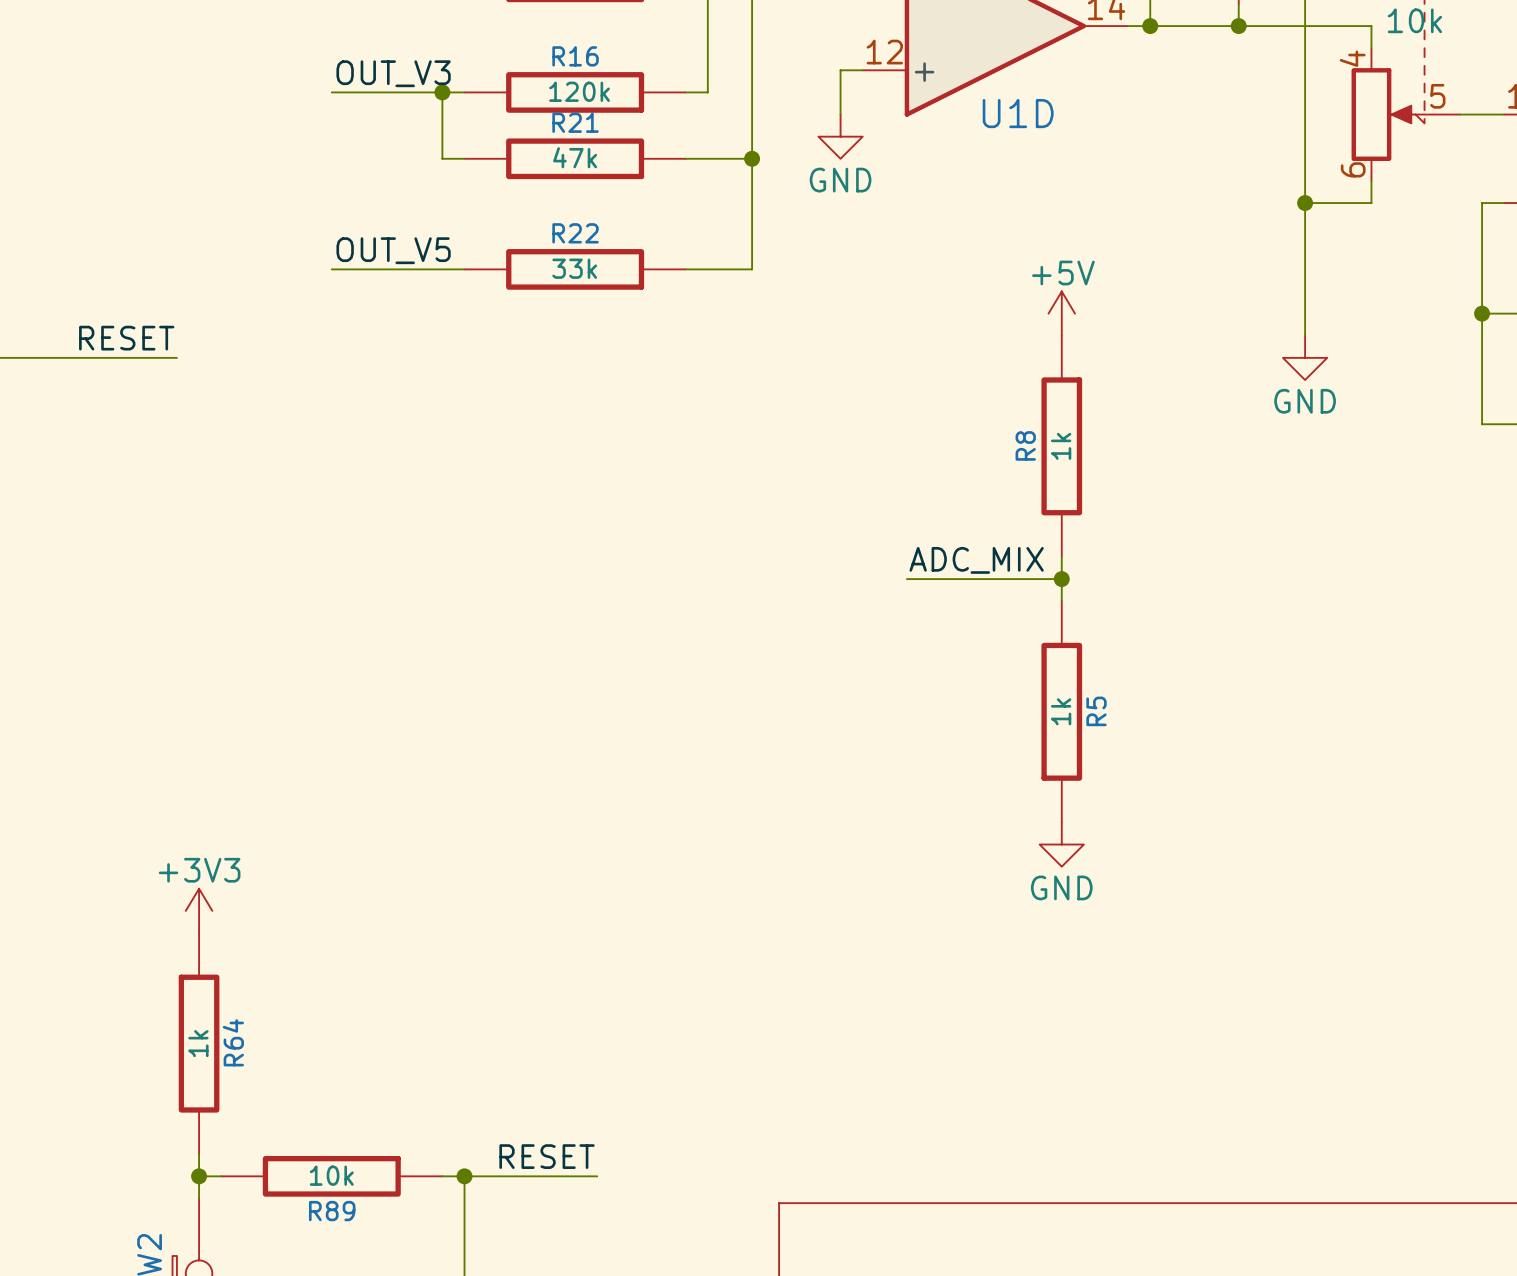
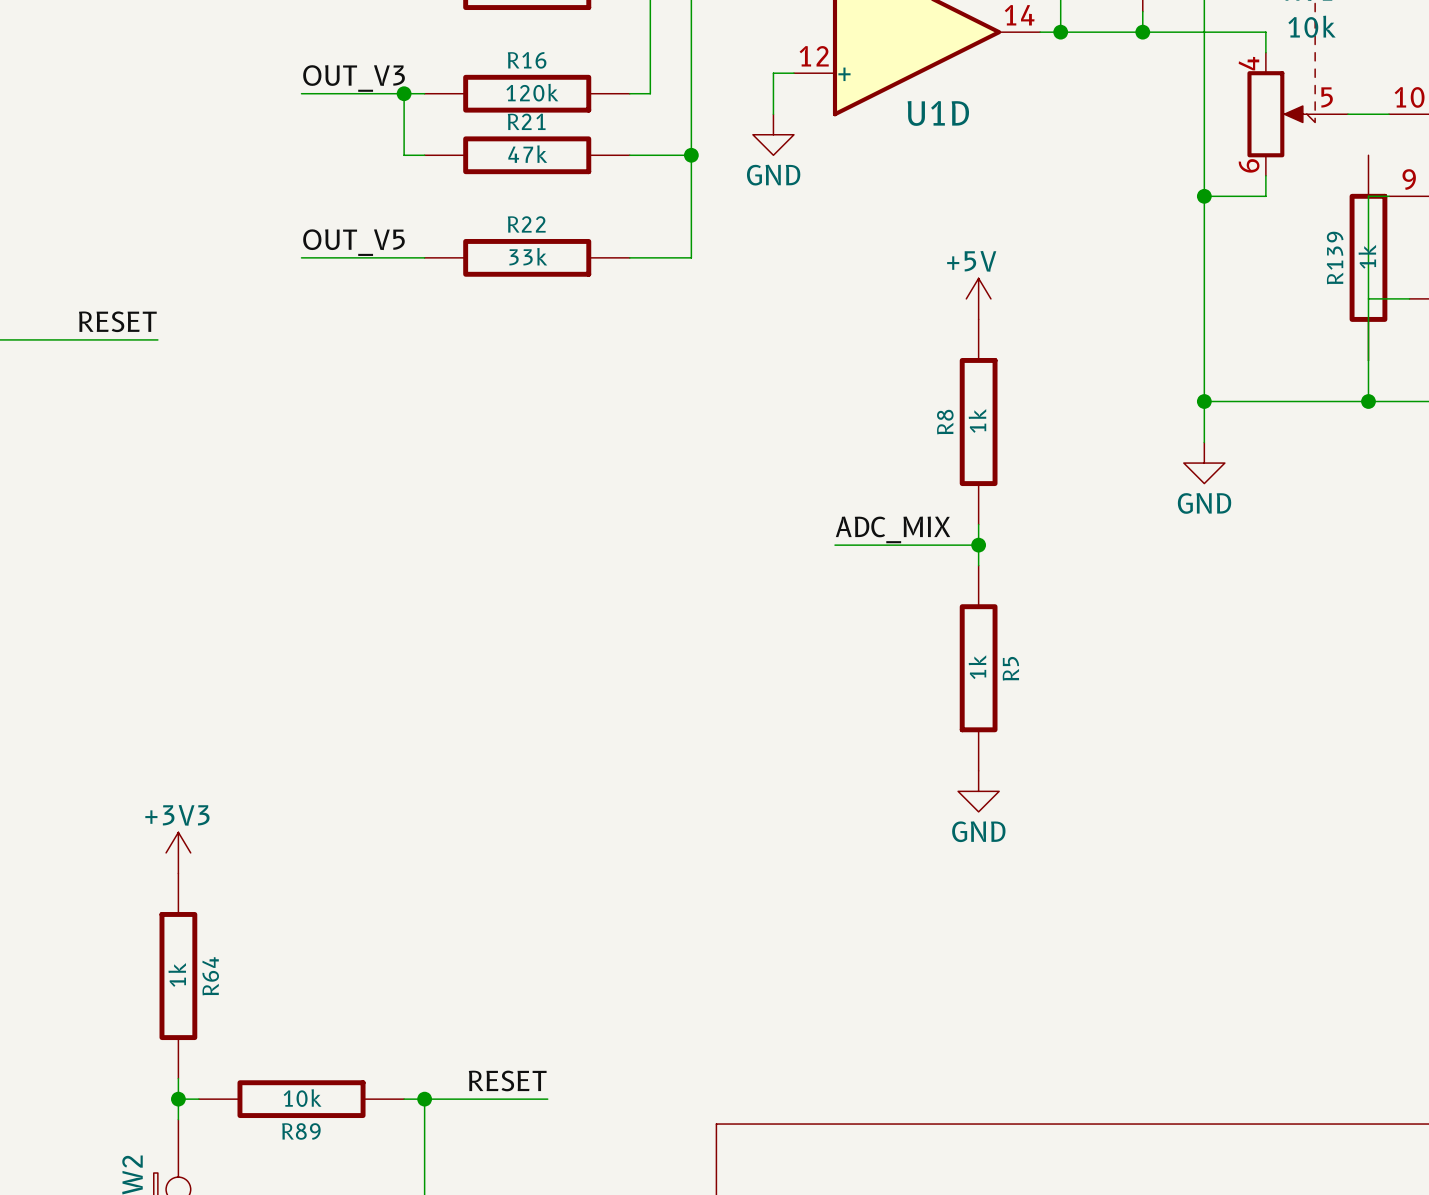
R139: none -> 1k (1368, 257)
junction: (1482, 313) -> none
wire: none -> (1204, 319) (1204, 442)
power symbol position: GND (1305, 357) -> GND (1204, 463)
wire: none -> (1204, 401) (1368, 401)
junction: none -> (1204, 401)
junction: none -> (1368, 401)

